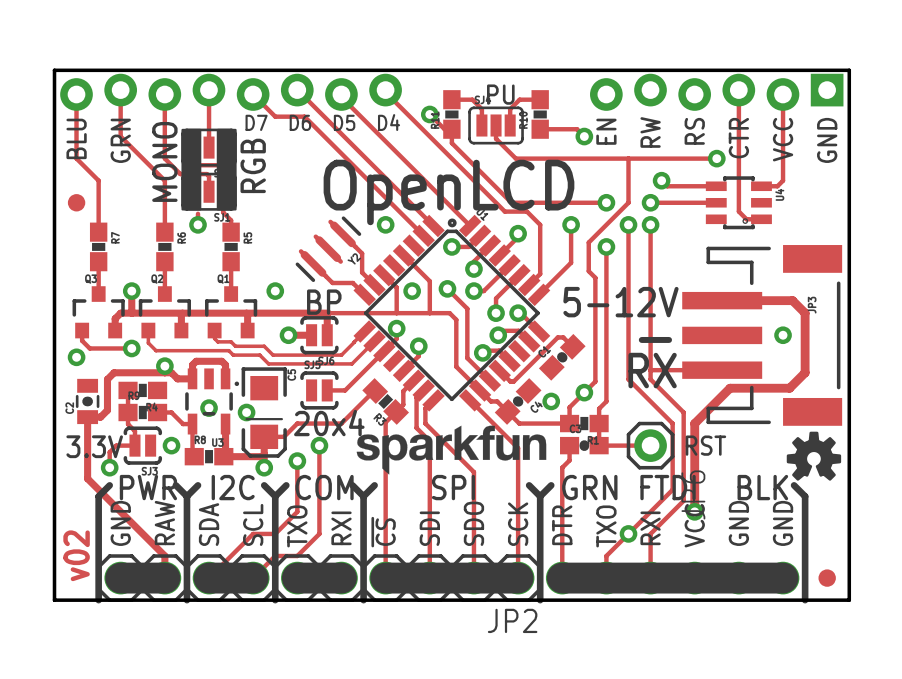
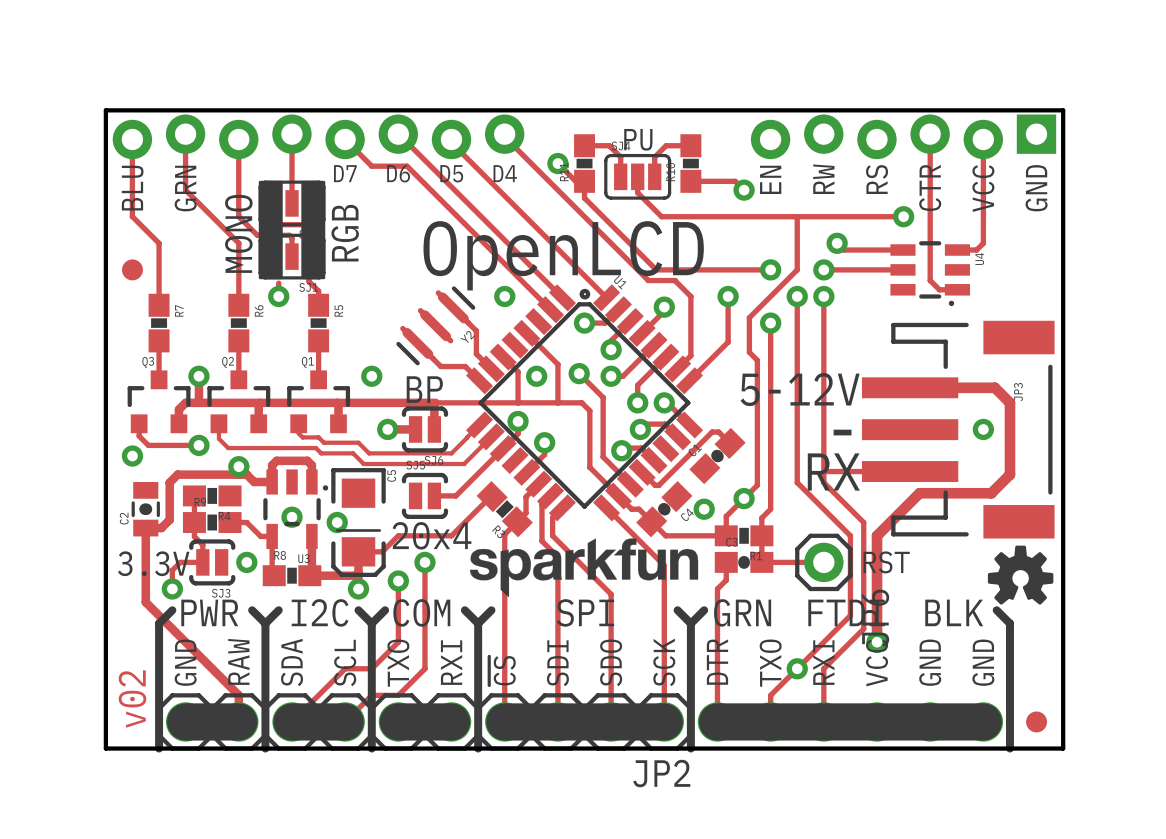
U4 footprint: [705, 176, 772, 230] -> [890, 241, 970, 307]

